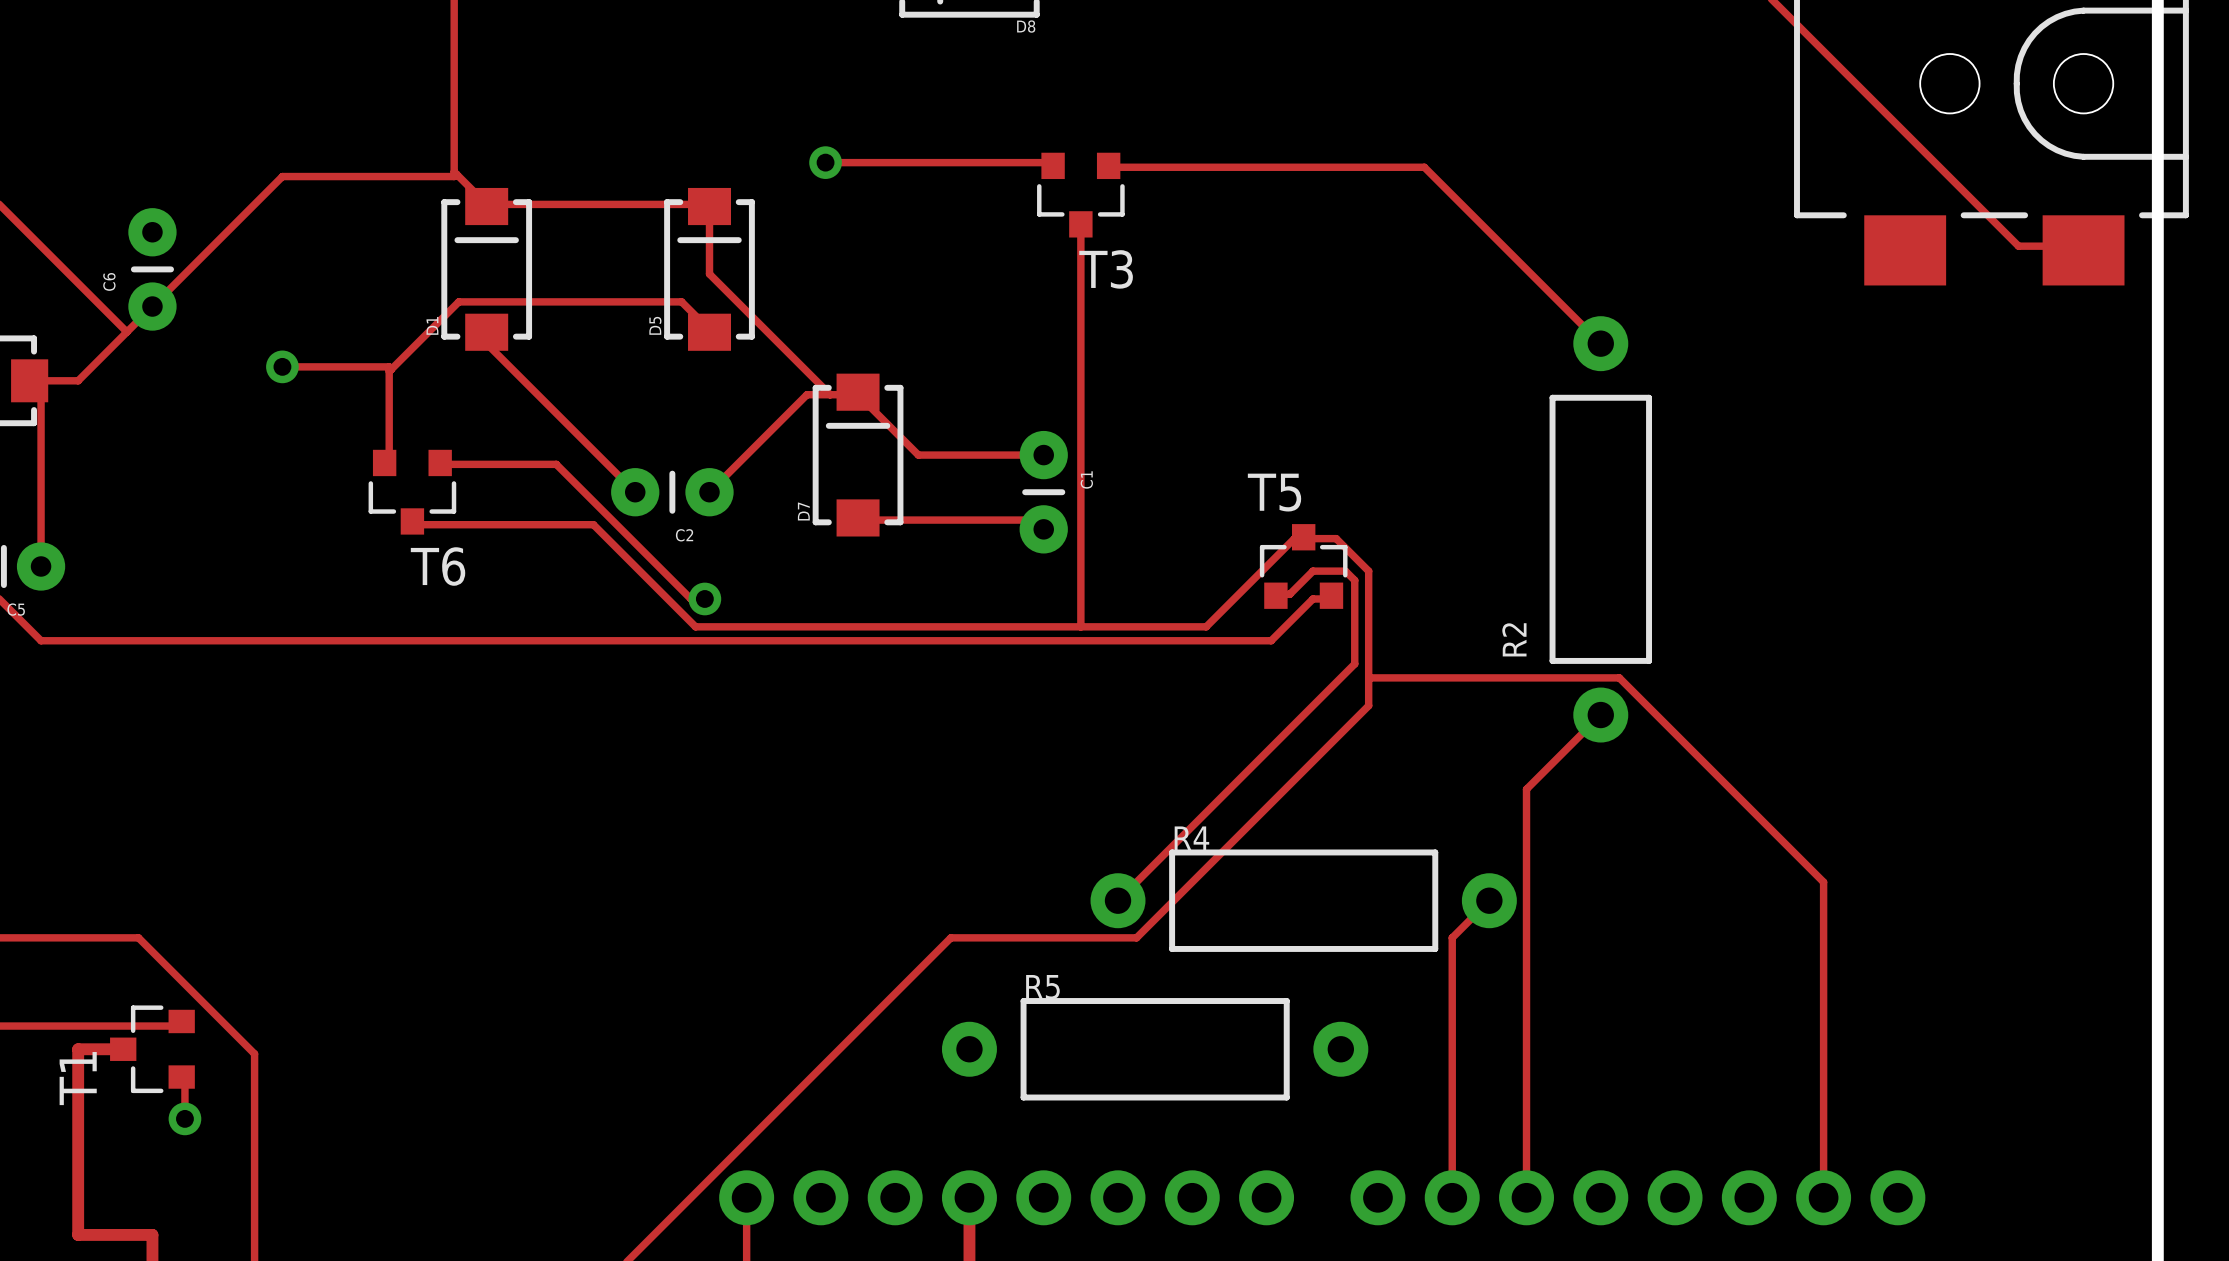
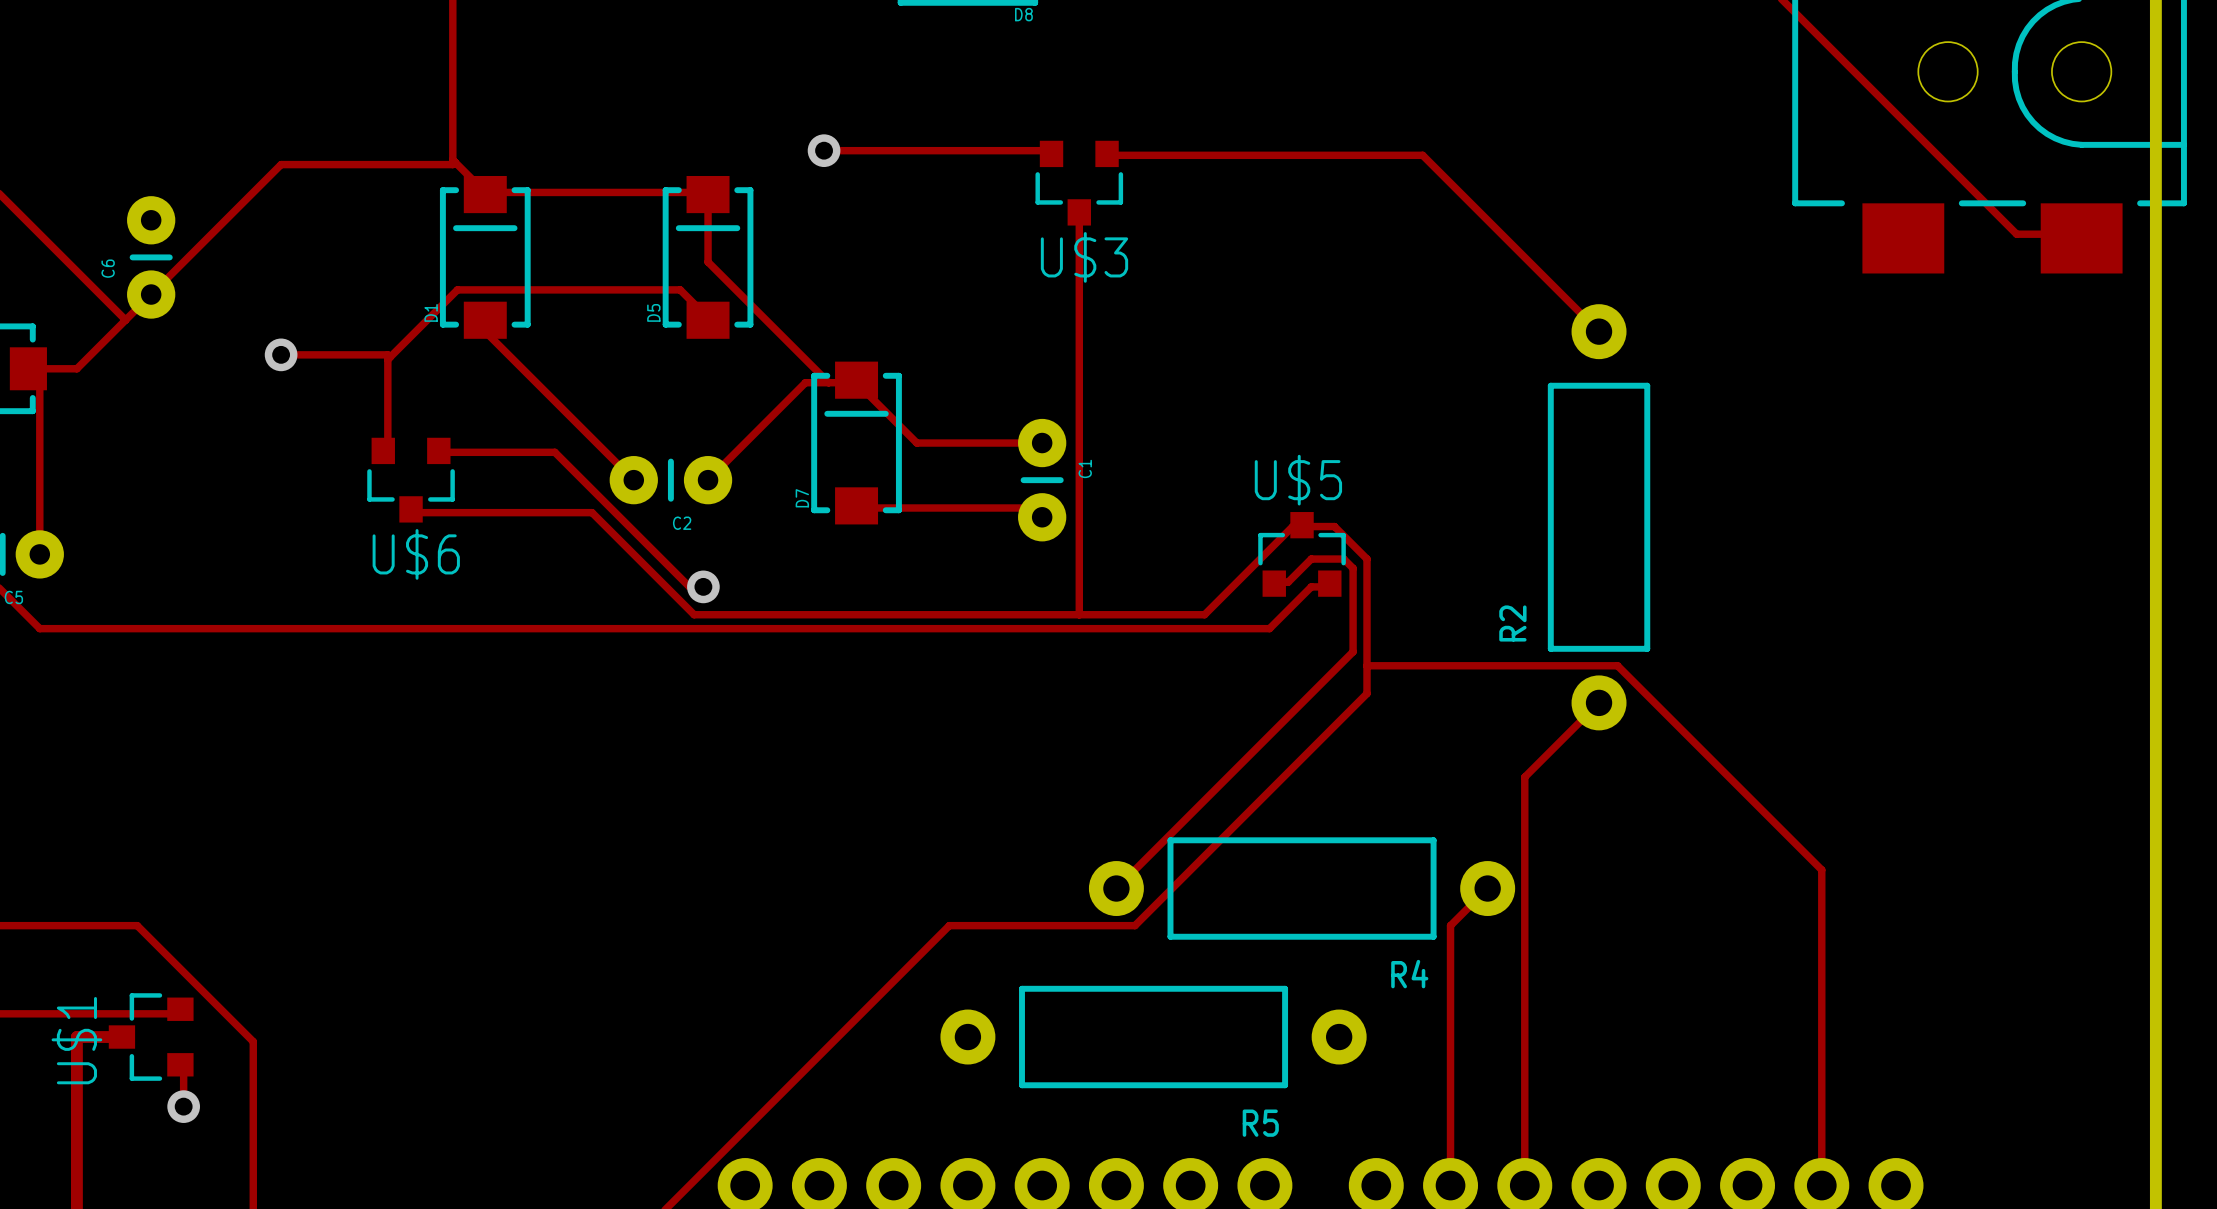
T3 name: T3 (1106, 269) -> U$3 (1084, 257)
T5 name: T5 (1274, 492) -> U$5 (1298, 480)
T6 name: T6 (438, 566) -> U$6 (416, 554)
R4 name position: R4 (1191, 838) -> R4 (1409, 974)
R5 name position: R5 (1042, 987) -> R5 (1260, 1123)
T1 name: T1 (78, 1078) -> U$1 (76, 1040)

